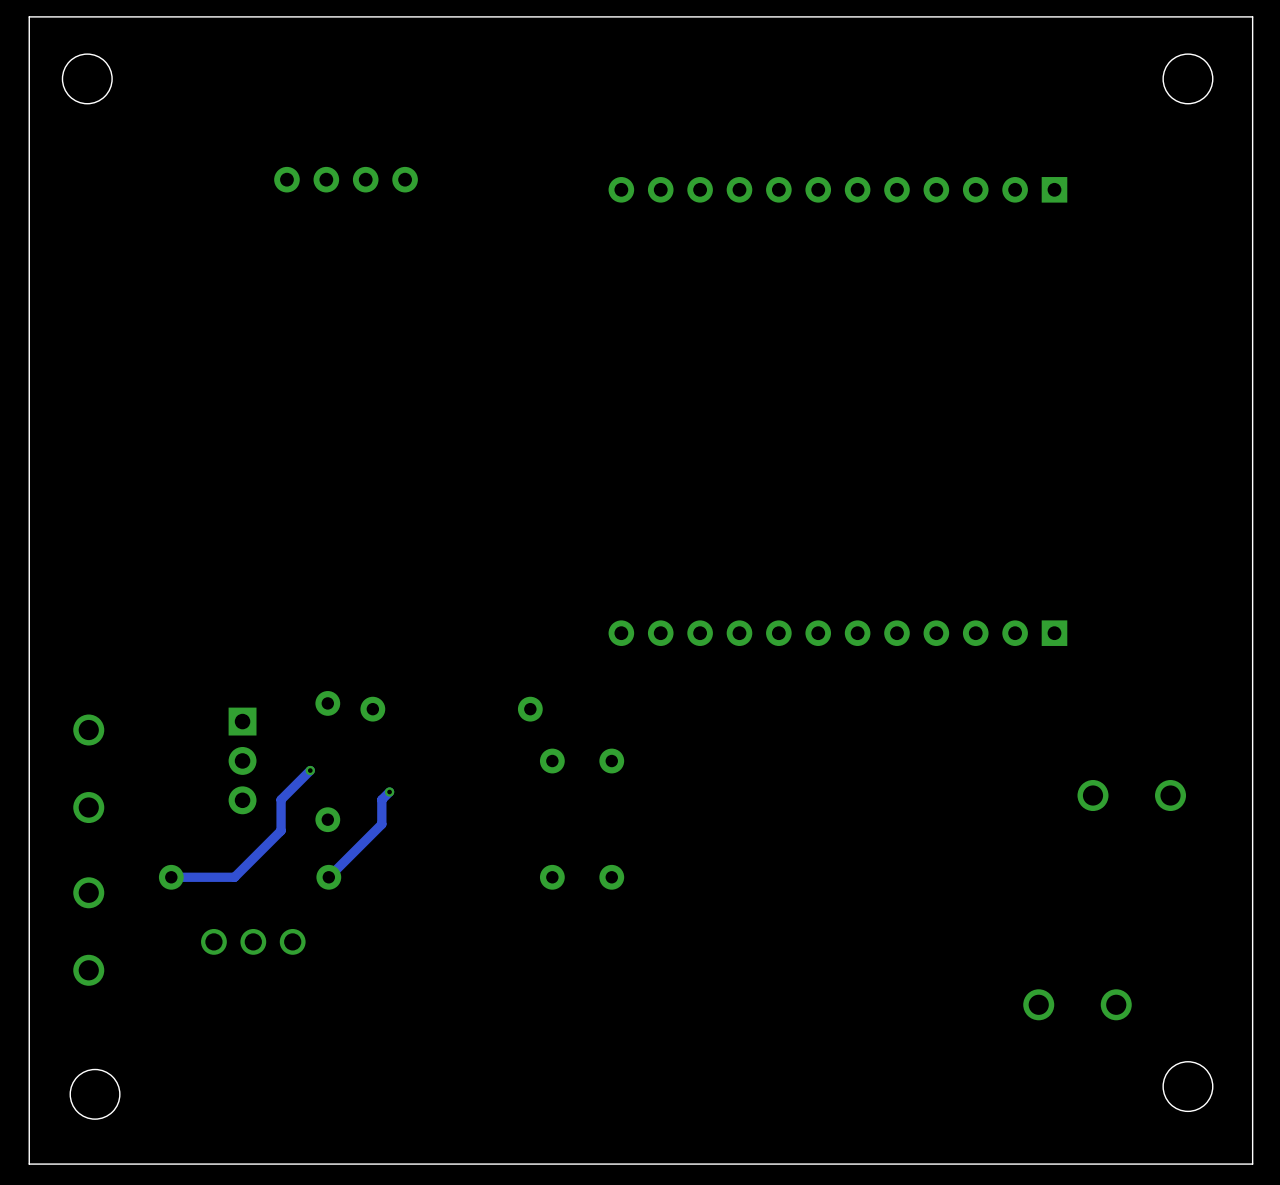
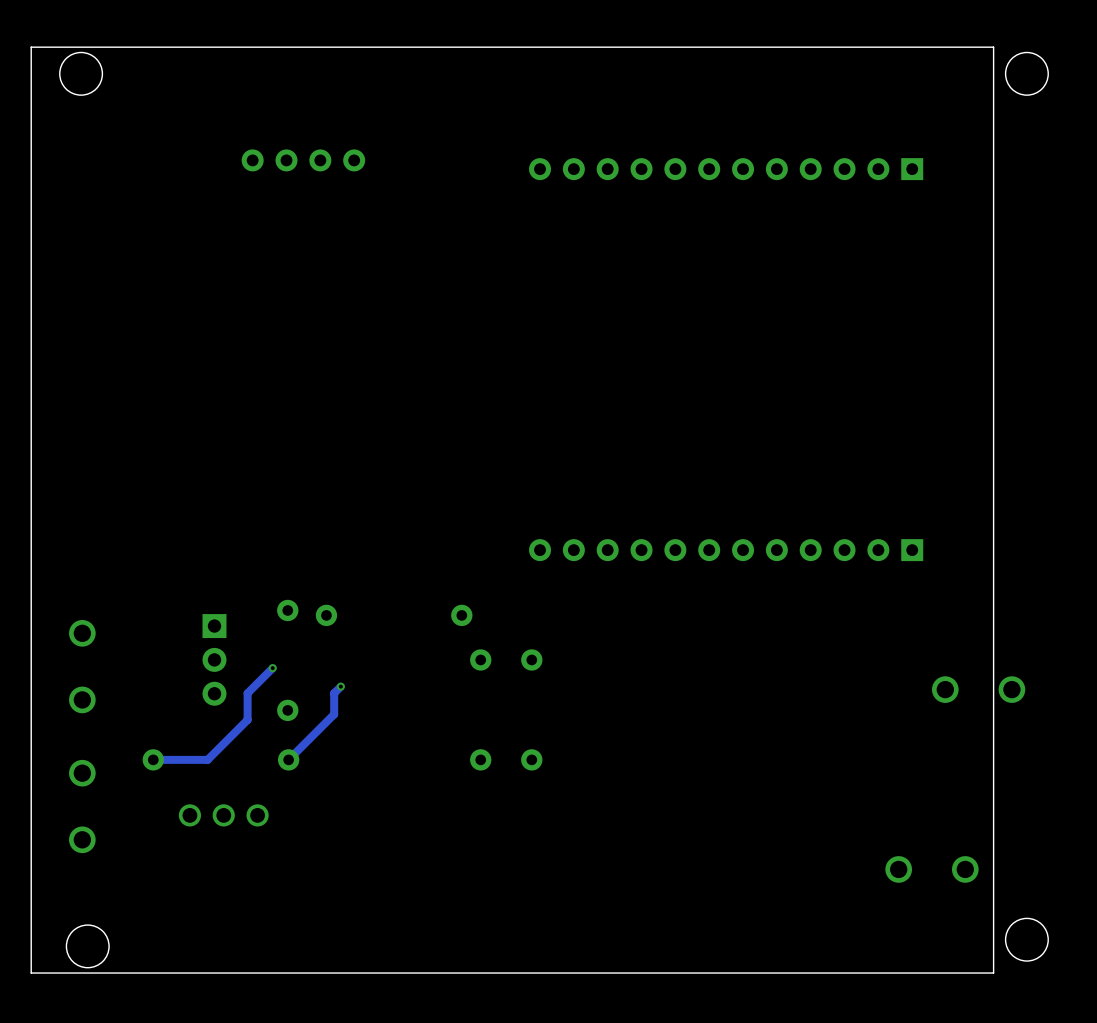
board edge: (29, 47) (29, 16) (1252, 16) (1252, 1164) (29, 1164) (29, 1125) -> (31, 47) (993, 47) (993, 973) (31, 973)

